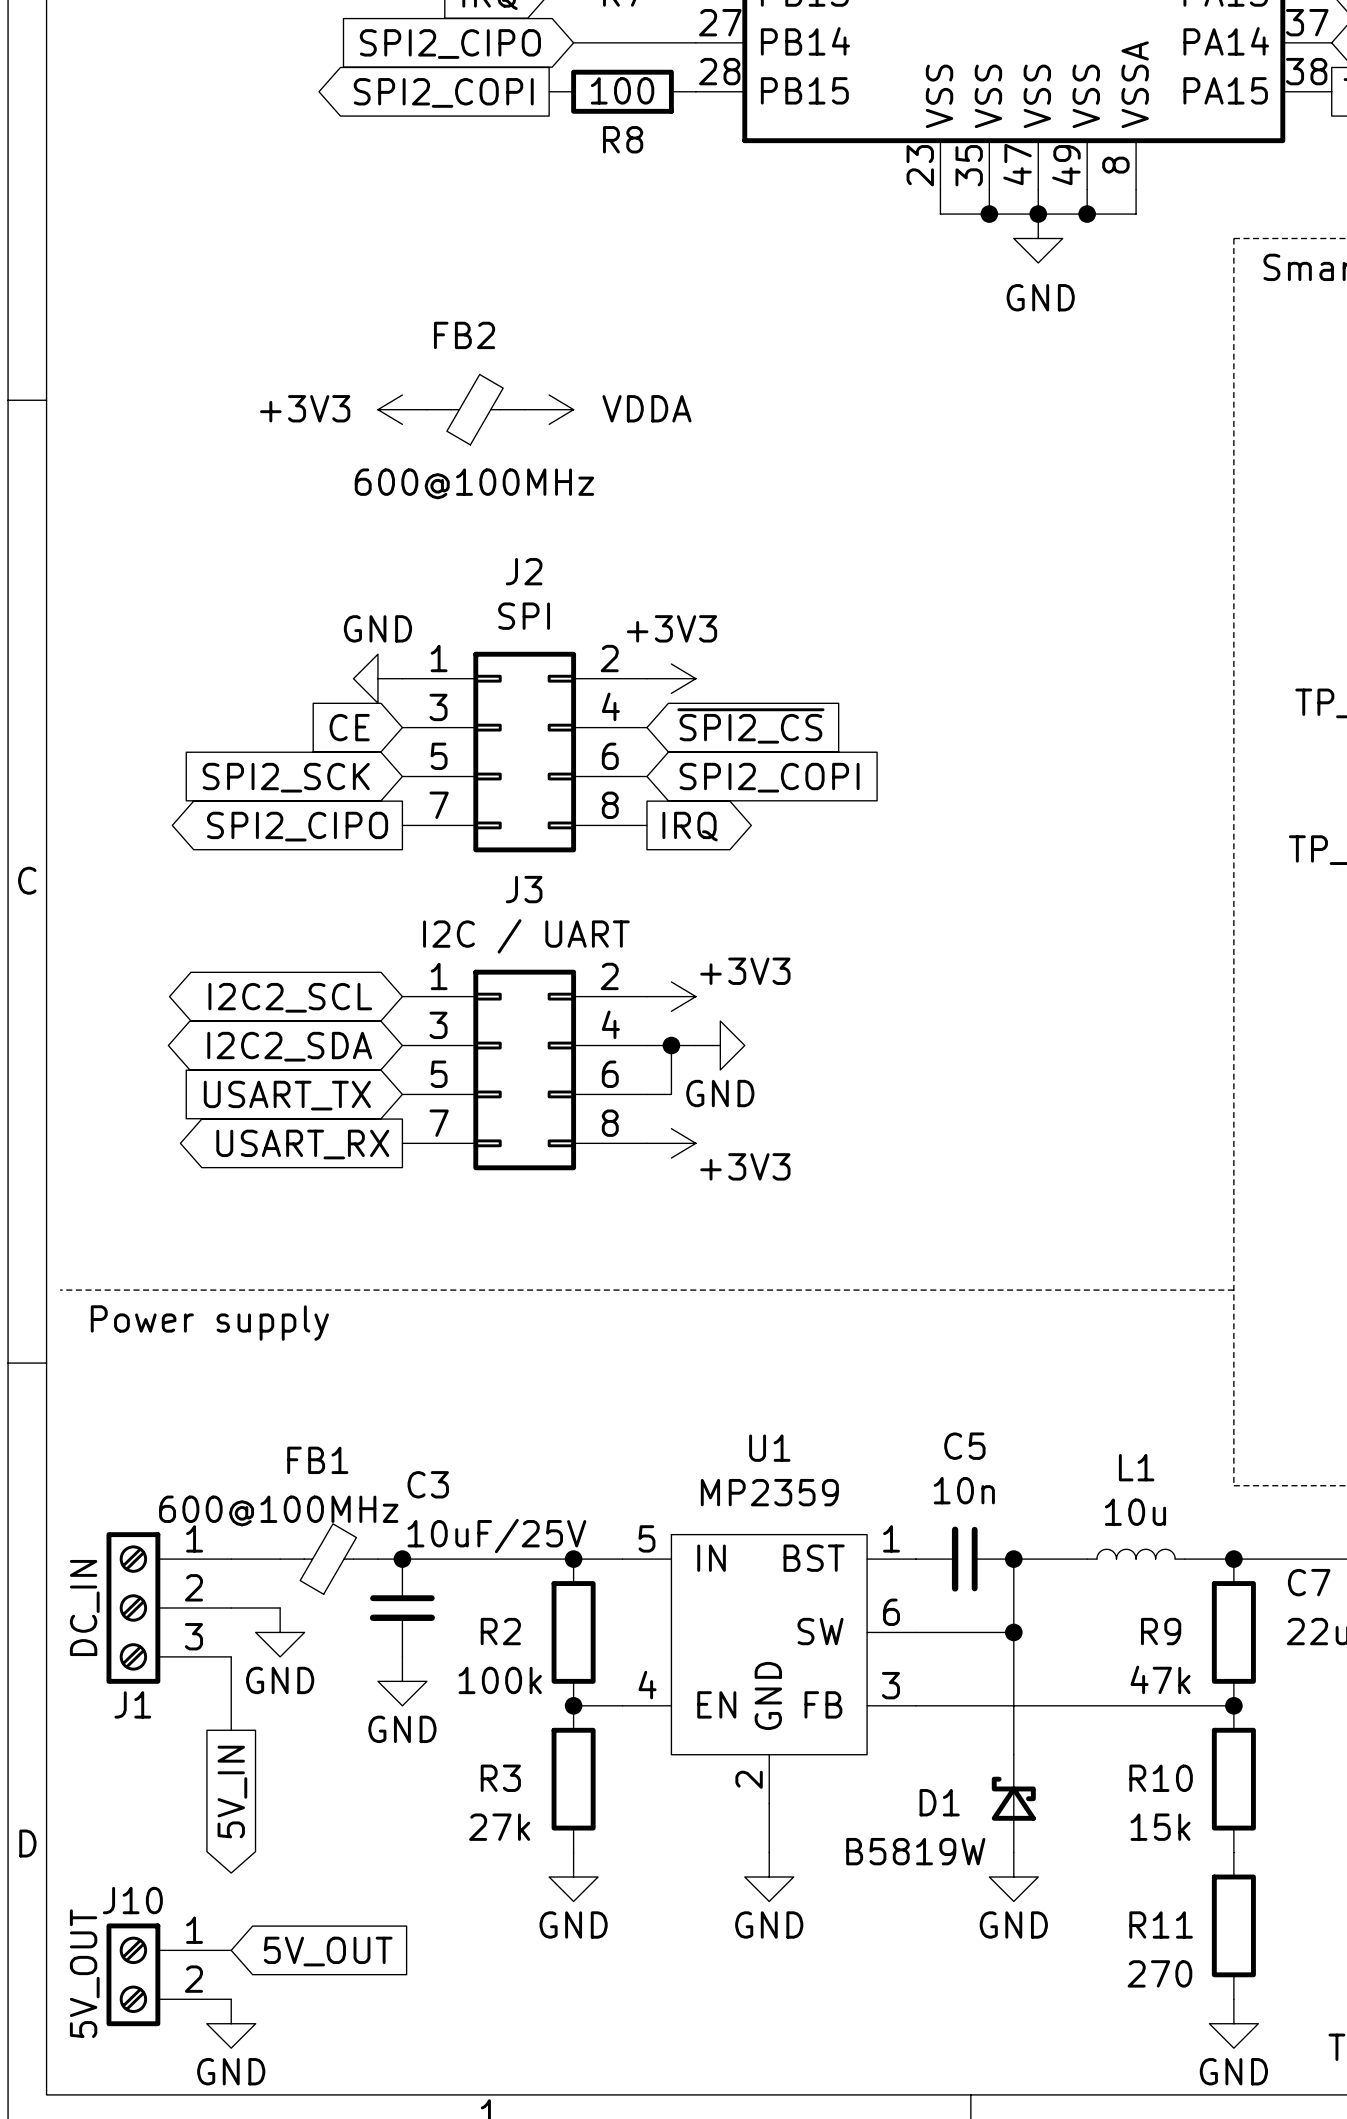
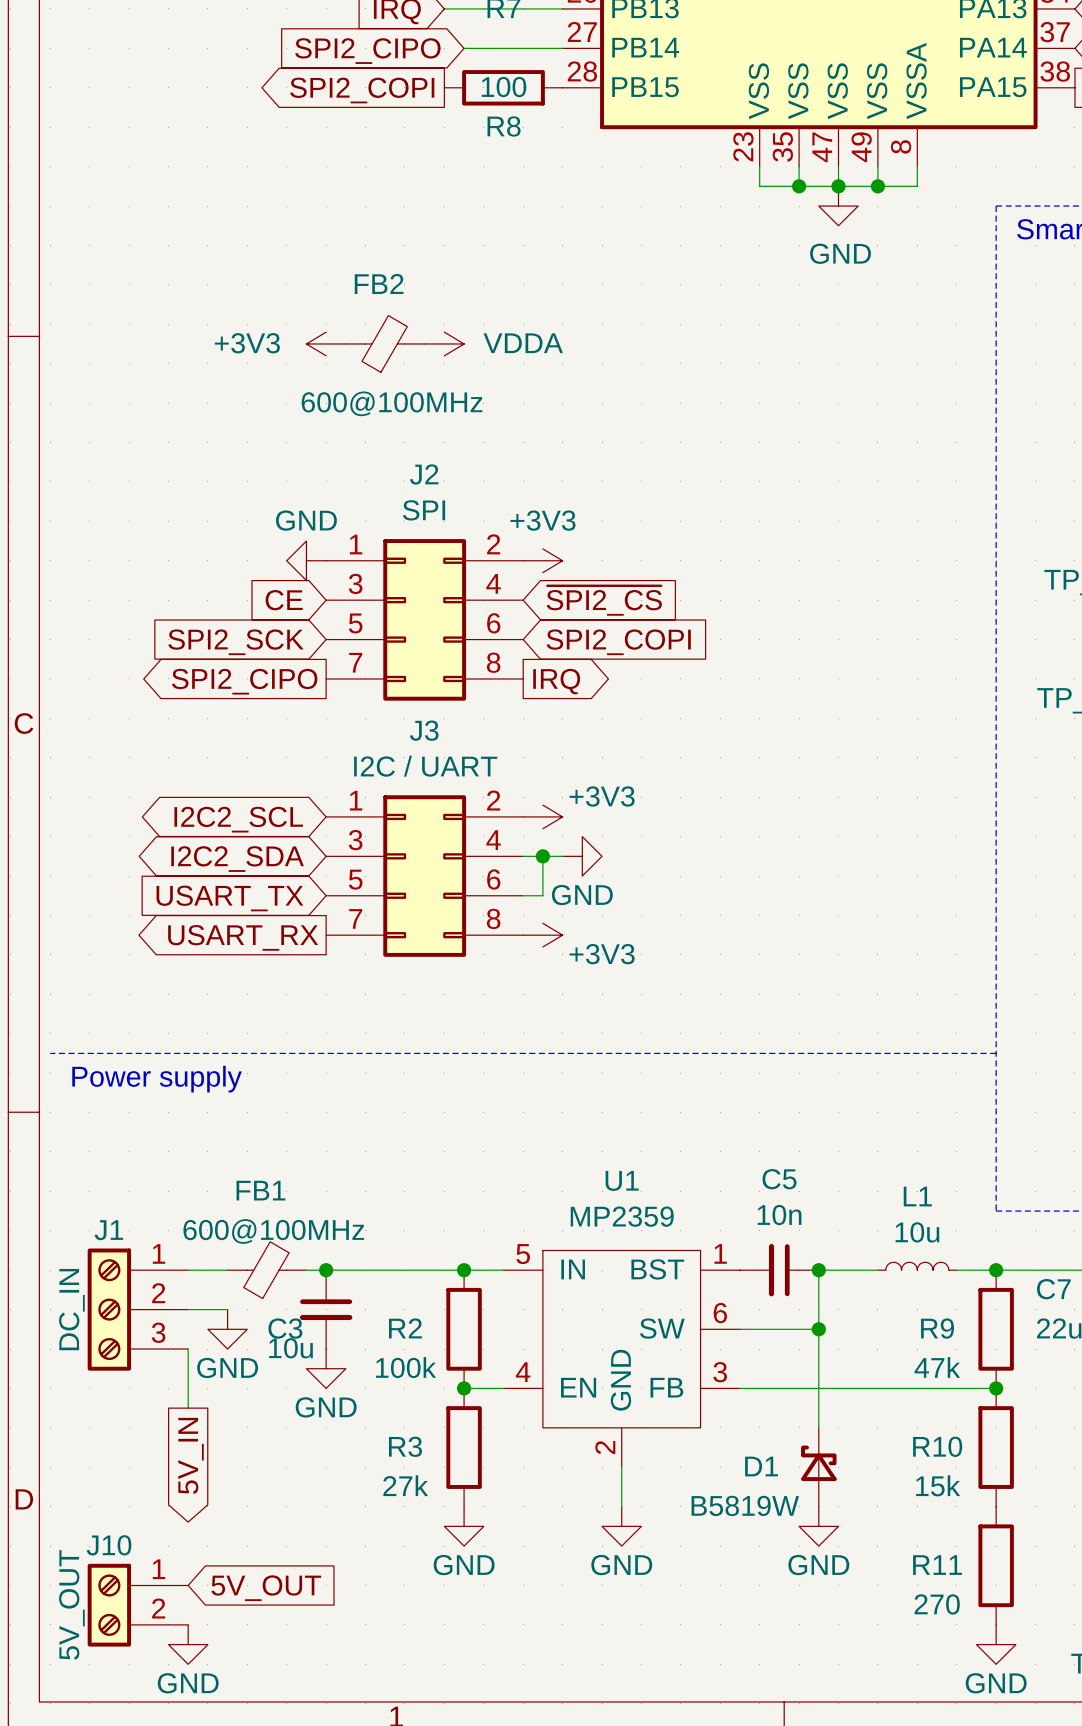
C3 name position: C3 (428, 1484) -> C3 (285, 1328)
FB1 value position: 600@100MHz (278, 1511) -> 600@100MHz (273, 1231)
C3 value: 10uF/25V (496, 1536) -> 10u (291, 1348)
J1 name position: J1 (132, 1704) -> J1 (108, 1230)

